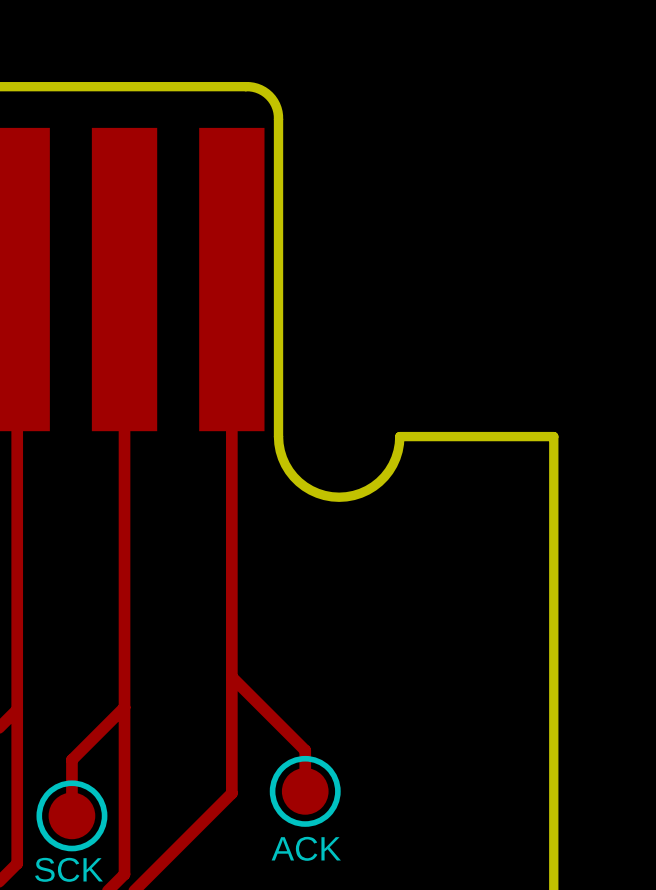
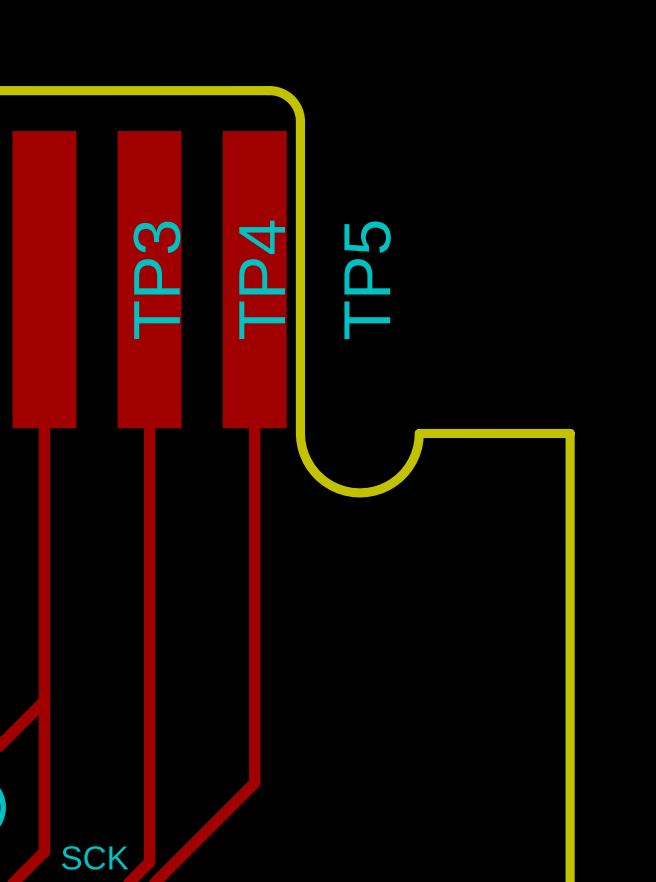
TP4 name: none -> TP4 (262, 279)
TP3 name: none -> TP3 (156, 280)
TP5 name: none -> TP5 (367, 280)
top track: (231, 677) (305, 750) (305, 791) -> none
top track: (124, 707) (71, 759) (71, 815) -> none
part: (305, 791) -> none
part: (71, 815) -> none
text: ACK (306, 848) -> none

